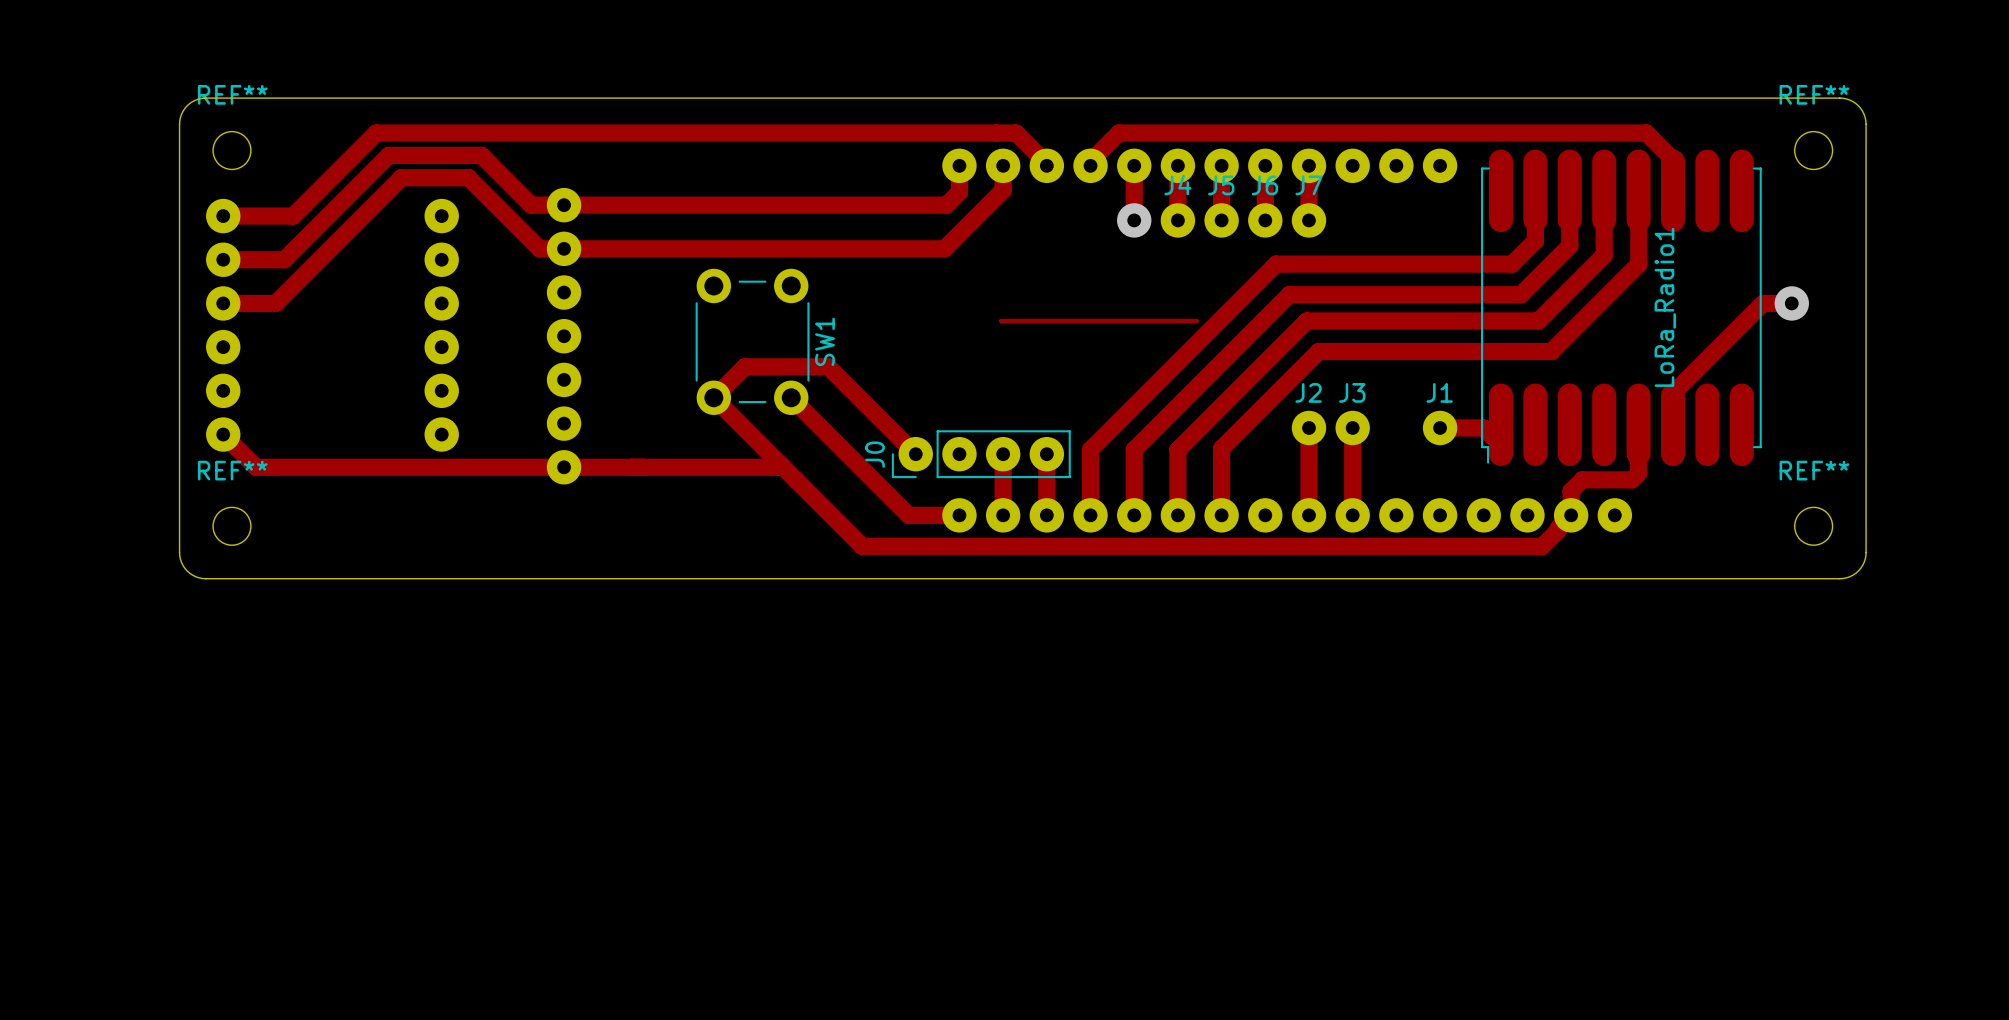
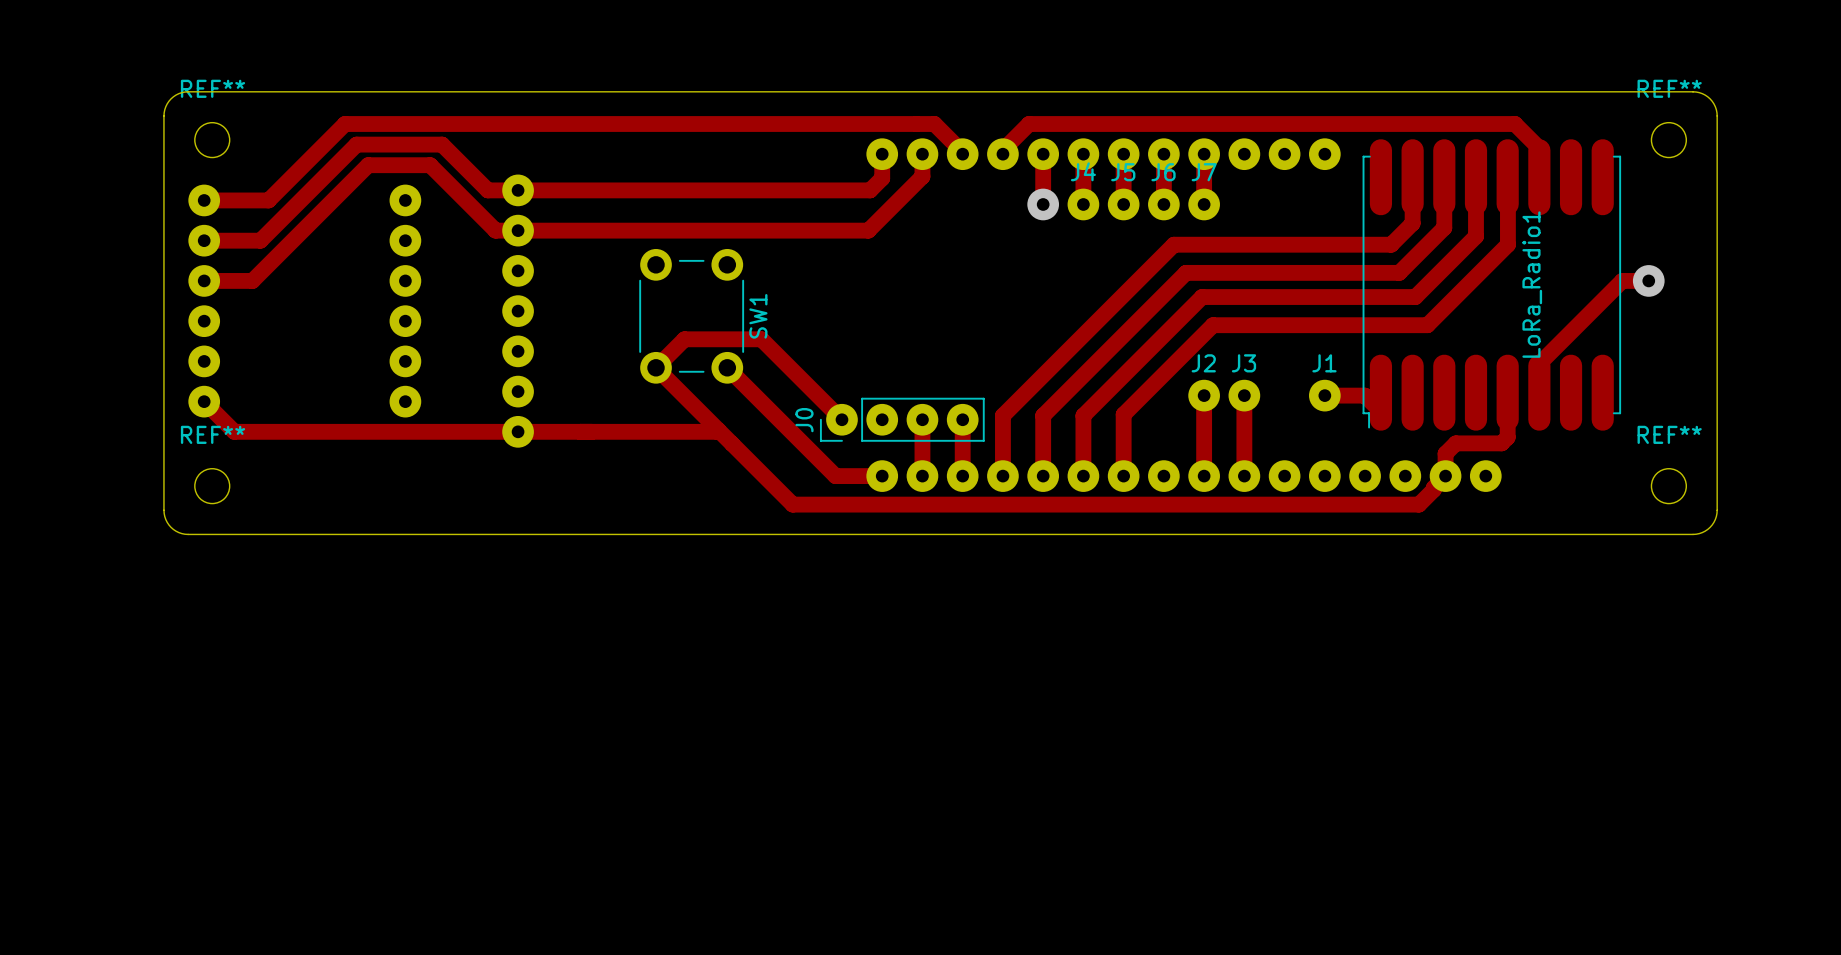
track: (1000, 320) (1196, 320) -> none

